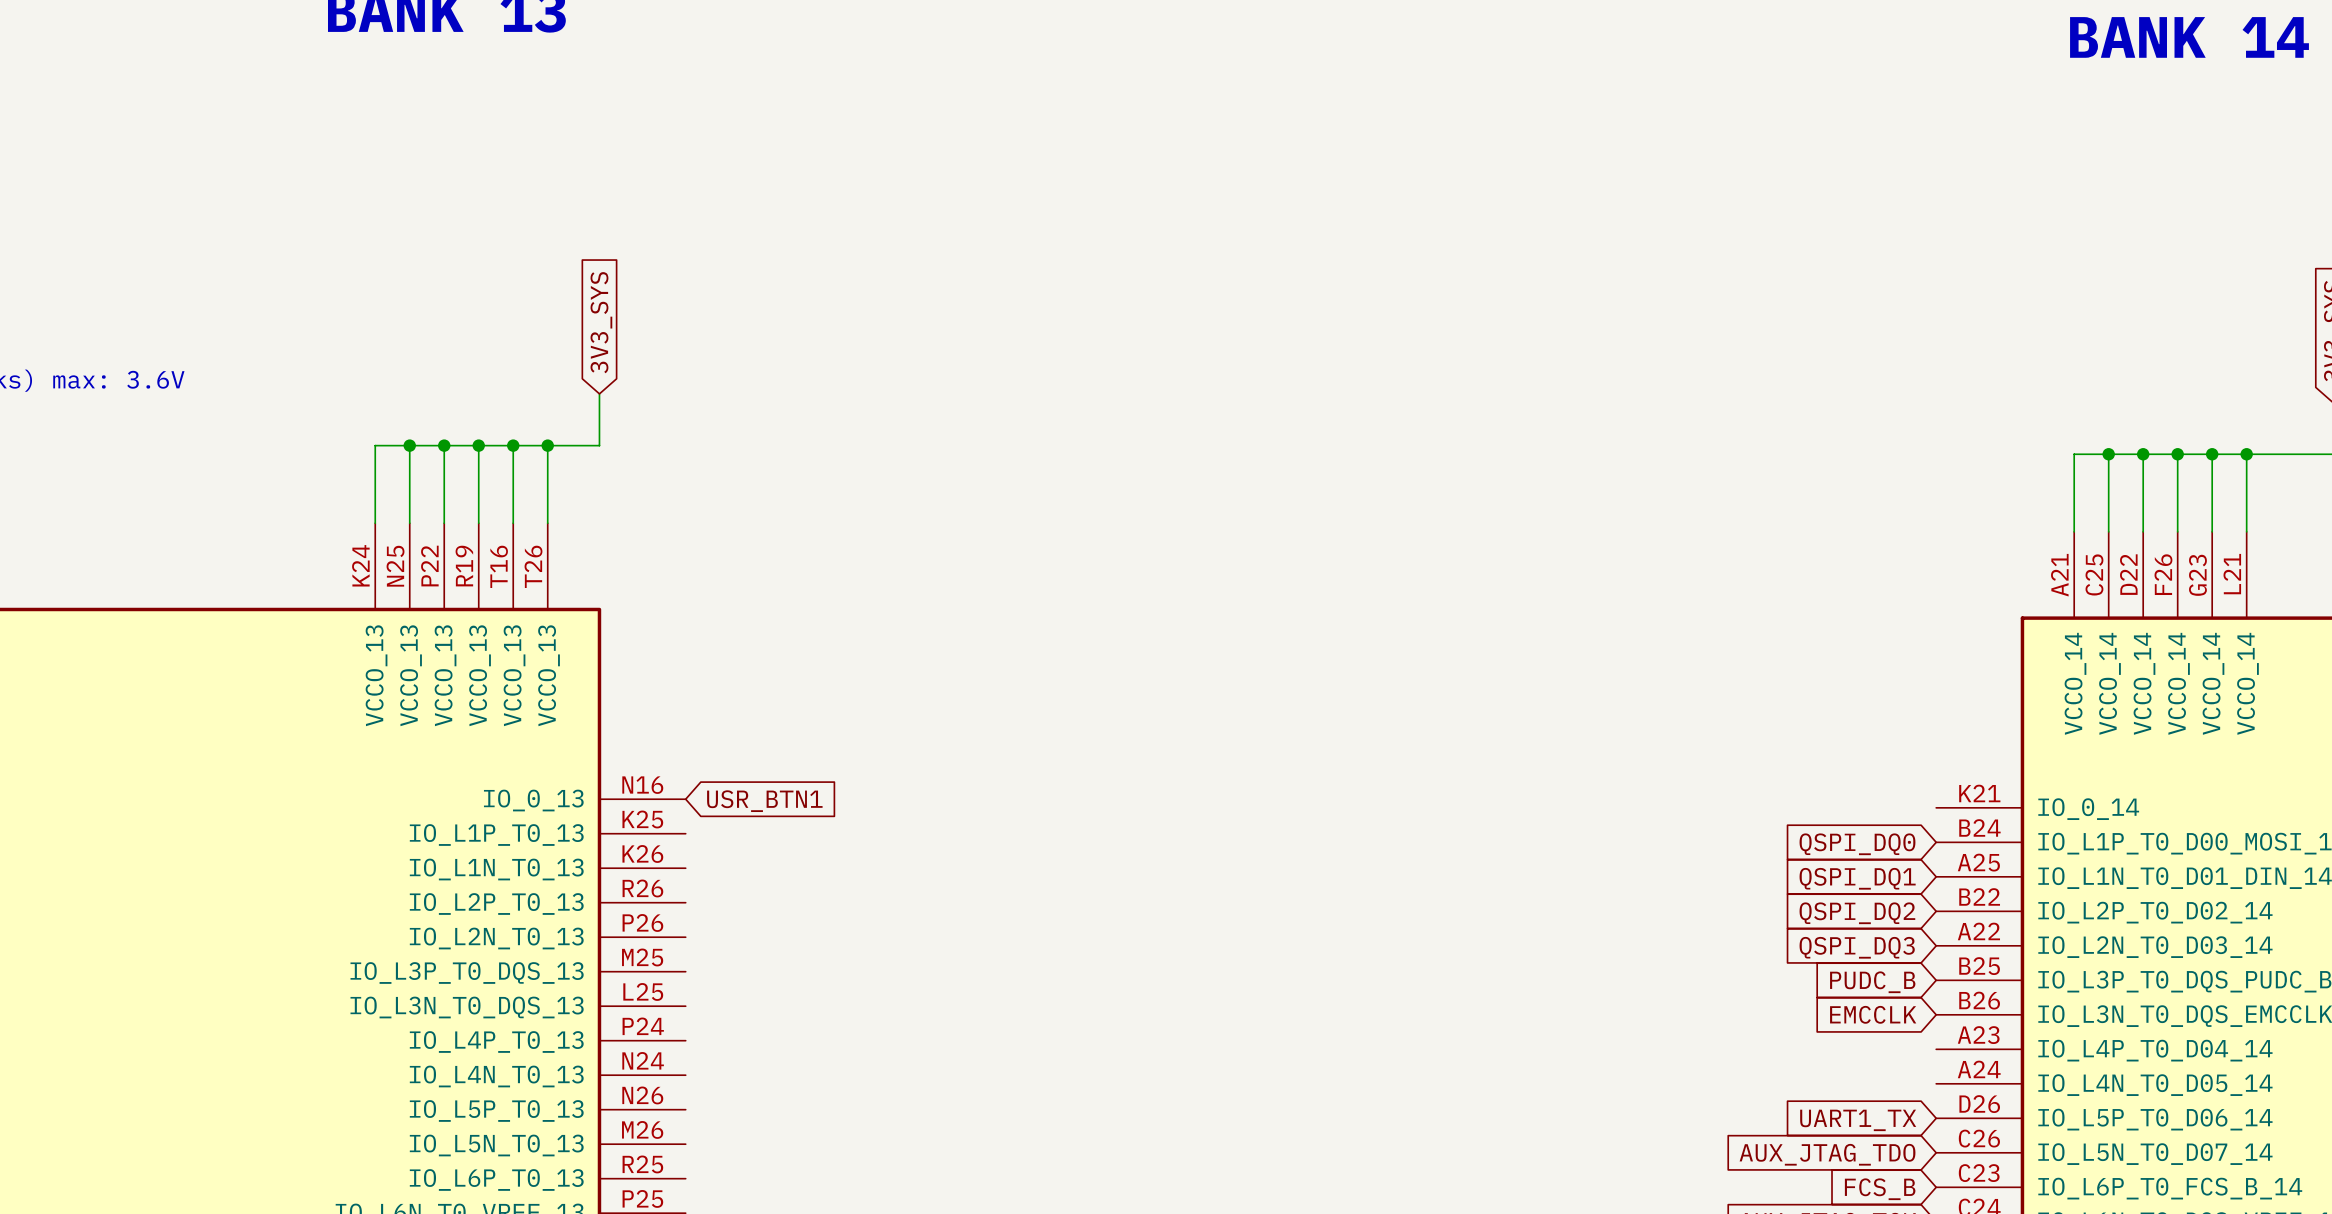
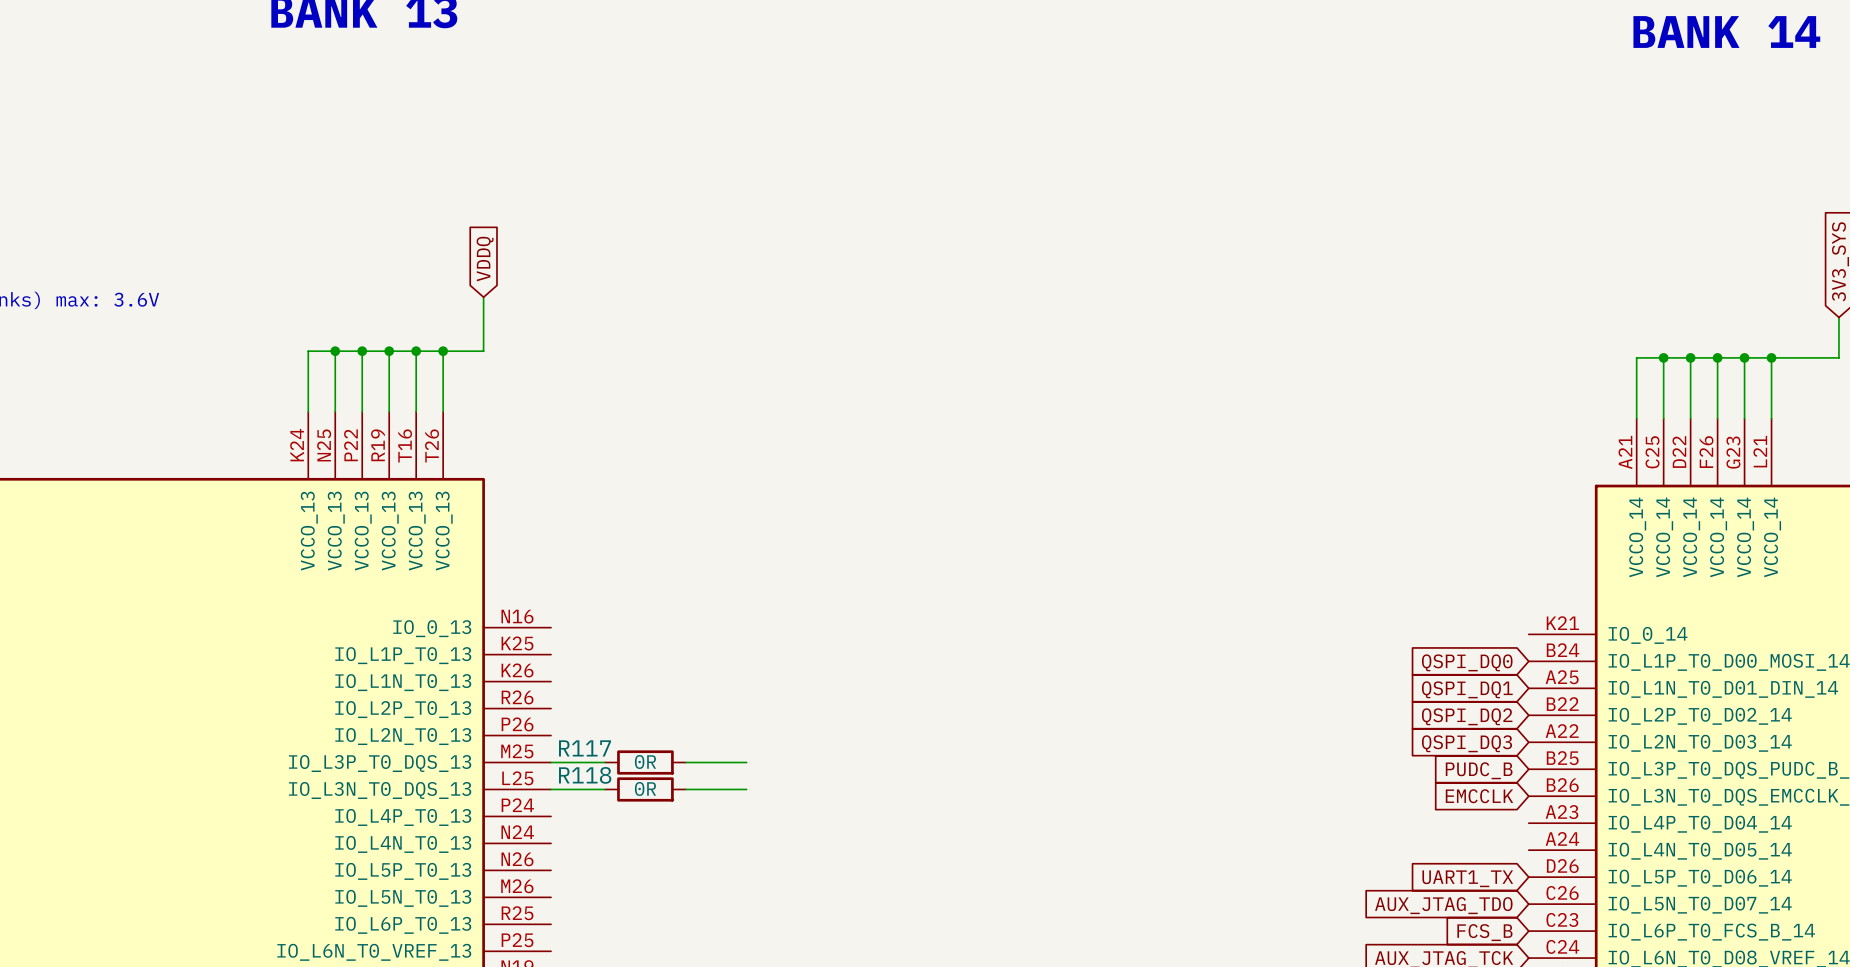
global label: 3V3_SYS (601, 322) -> none
global label: none -> VDDQ (485, 259)
wire: none -> (483, 297) (483, 310)
global label: USR_BTN1 (764, 801) -> none
wire: none -> (551, 762) (604, 762)
R117: none -> (645, 762)
wire: none -> (685, 762) (746, 762)
wire: none -> (551, 789) (604, 789)
R118: none -> (645, 789)
wire: none -> (685, 789) (746, 789)

